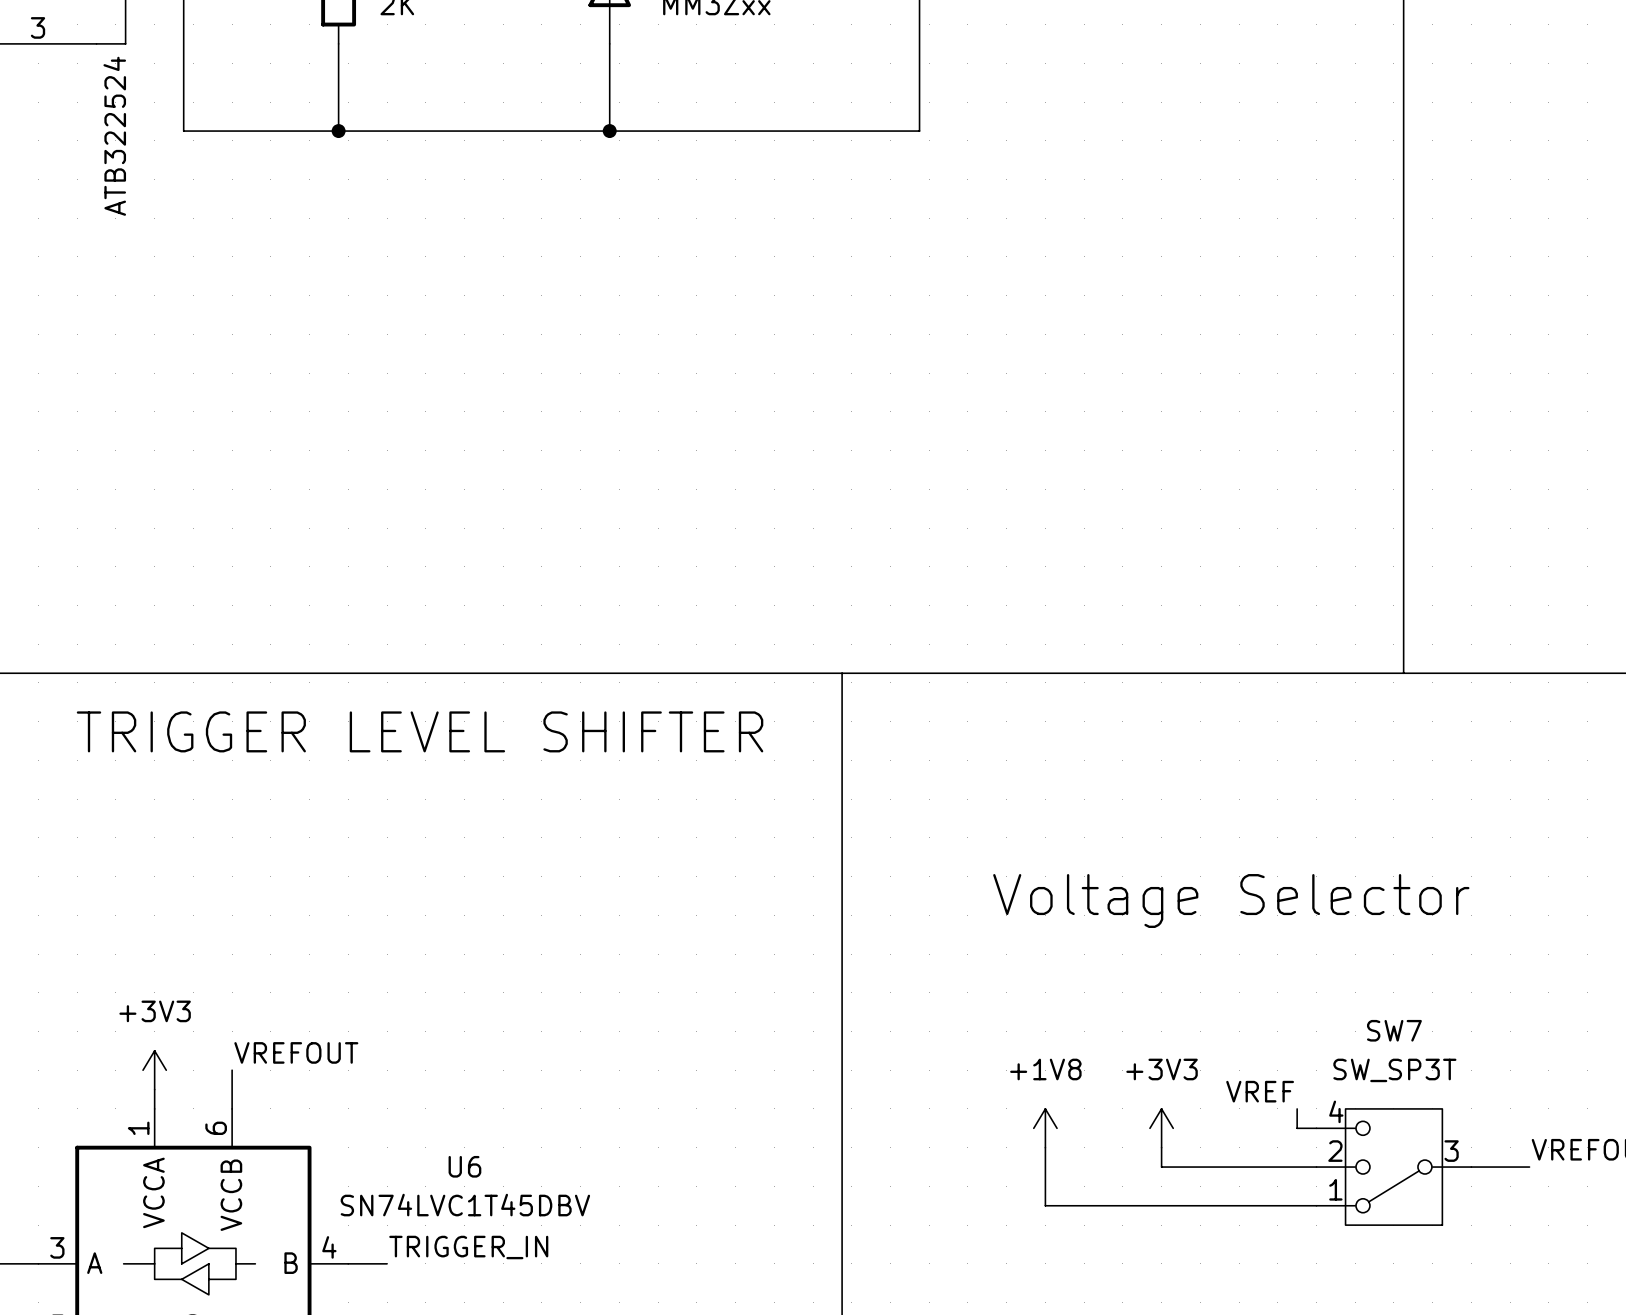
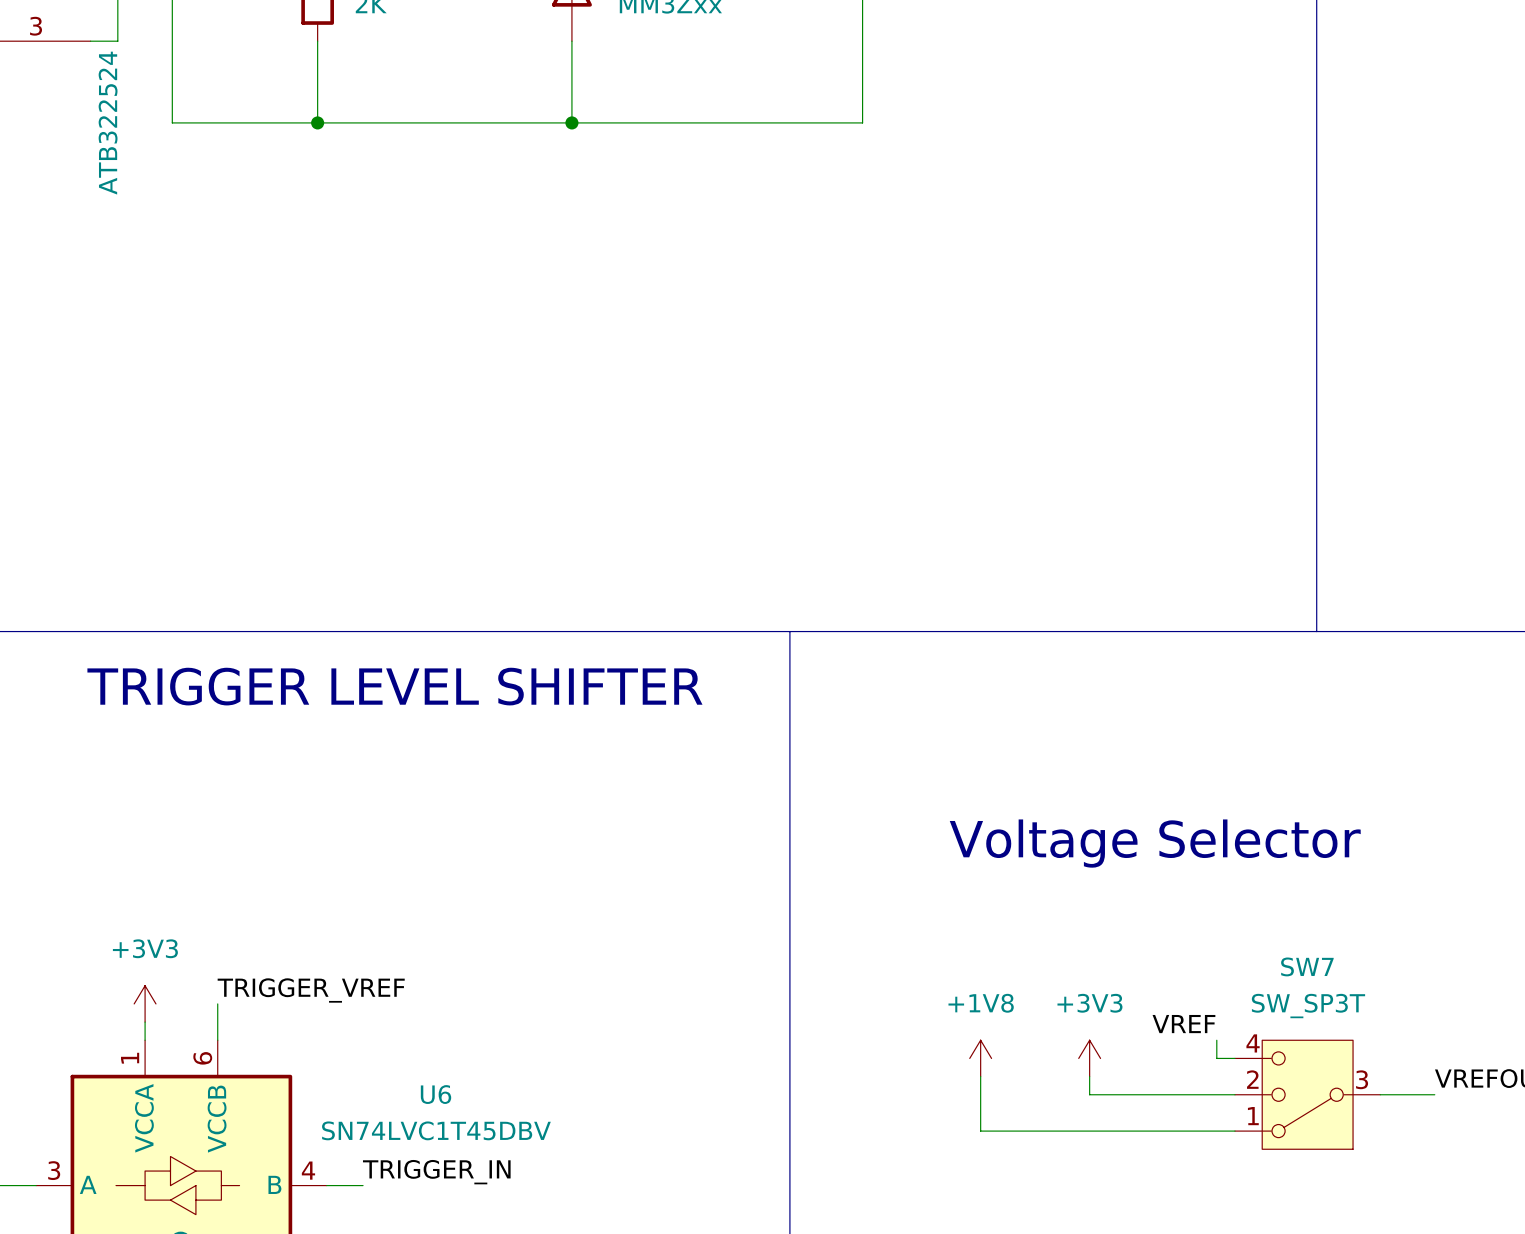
label: VREFOUT (296, 1052) -> TRIGGER_VREF (311, 990)

